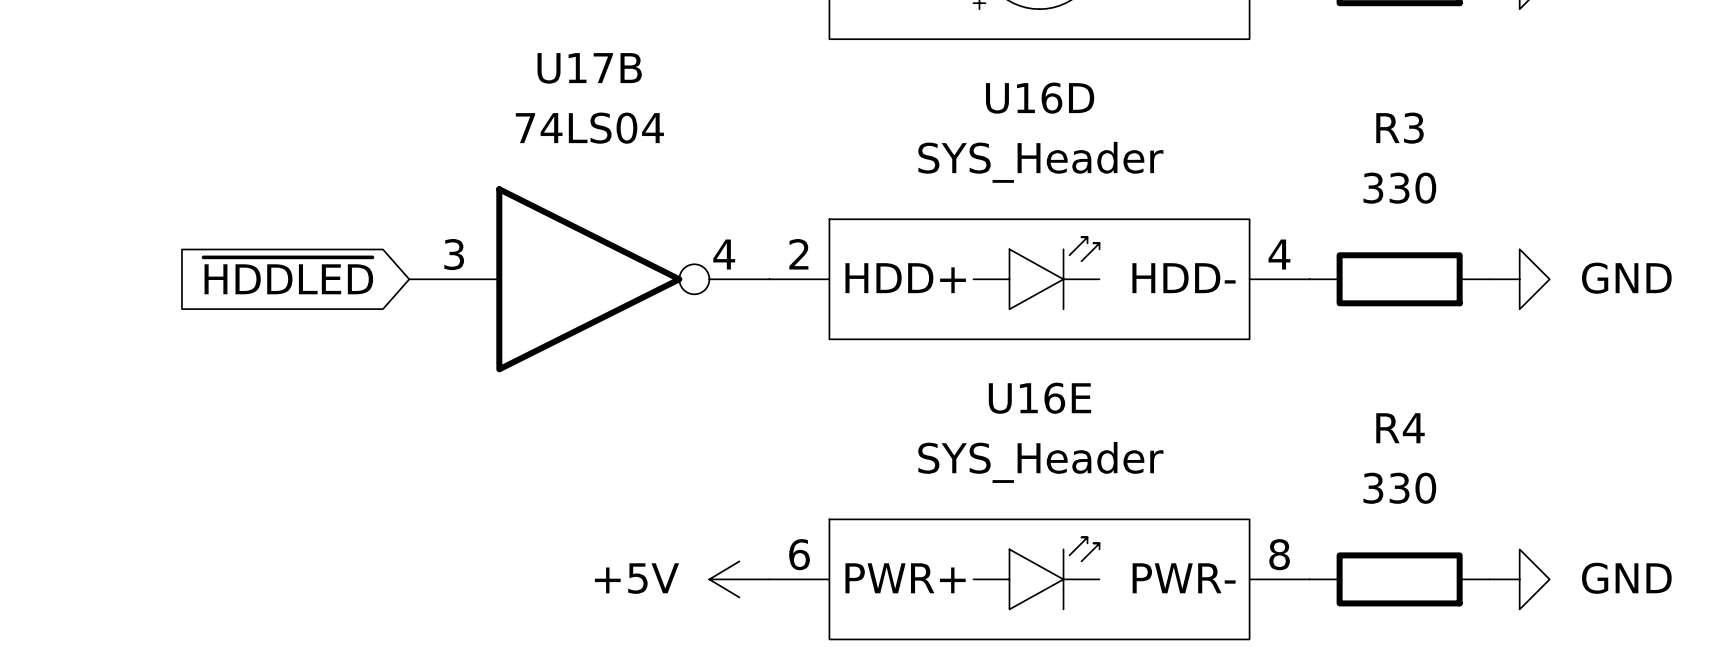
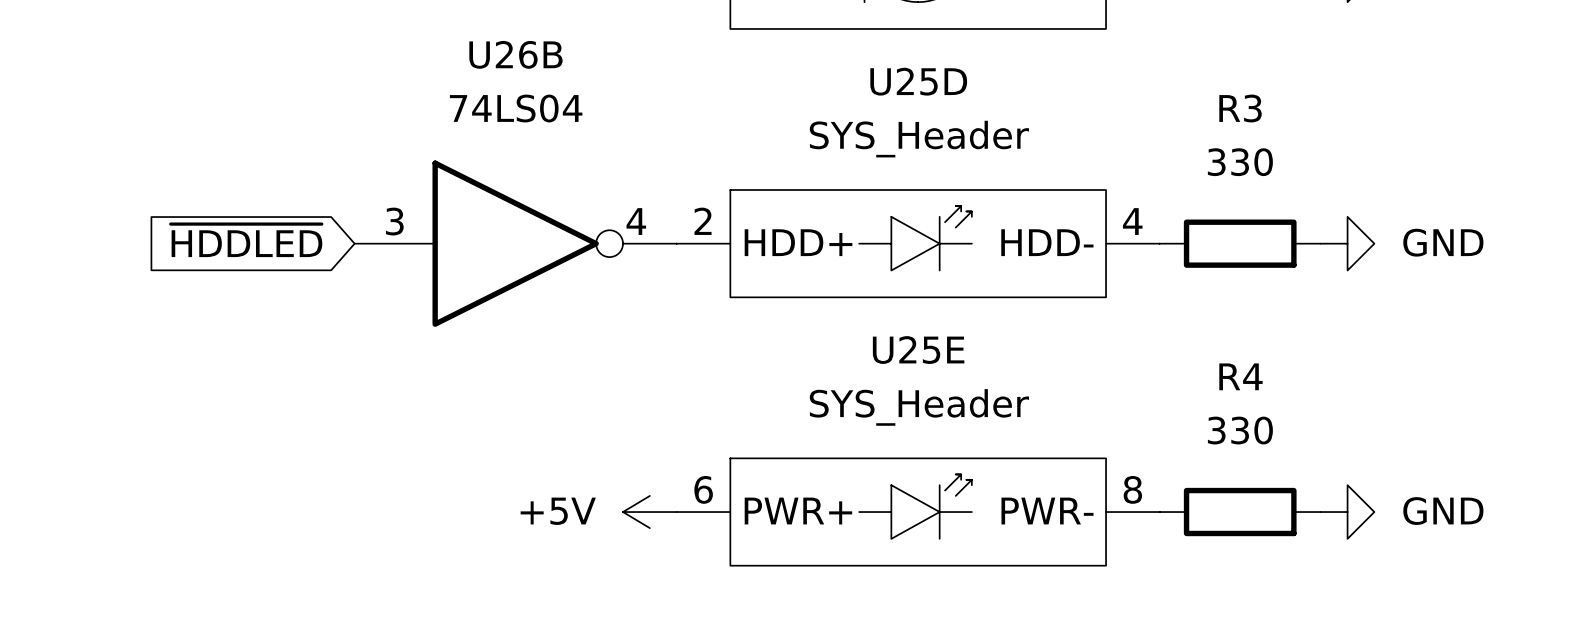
U17B name: U17B (589, 68) -> U26B (515, 54)
U16D name: U16D (1040, 98) -> U25D (918, 81)
U16E name: U16E (1039, 398) -> U25E (918, 350)

